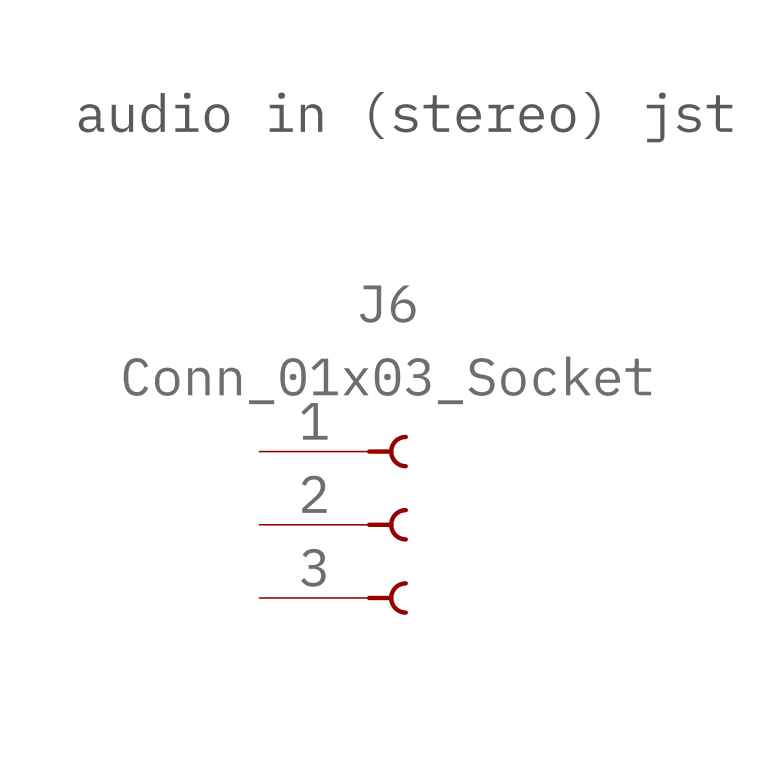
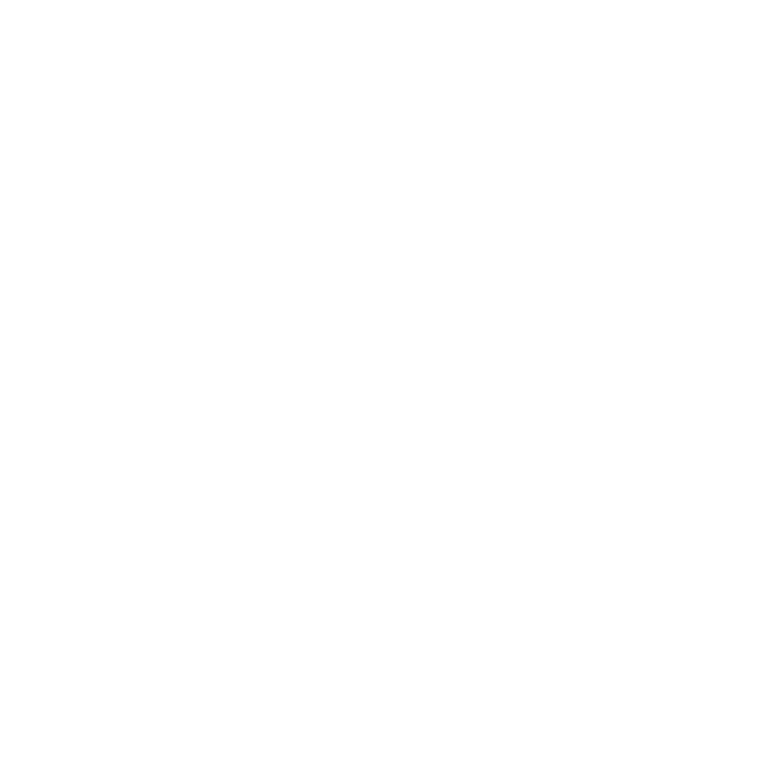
text: audio in (stereo) jst (405, 117) -> none
J6: Conn_01x03_Socket (333, 524) -> none

